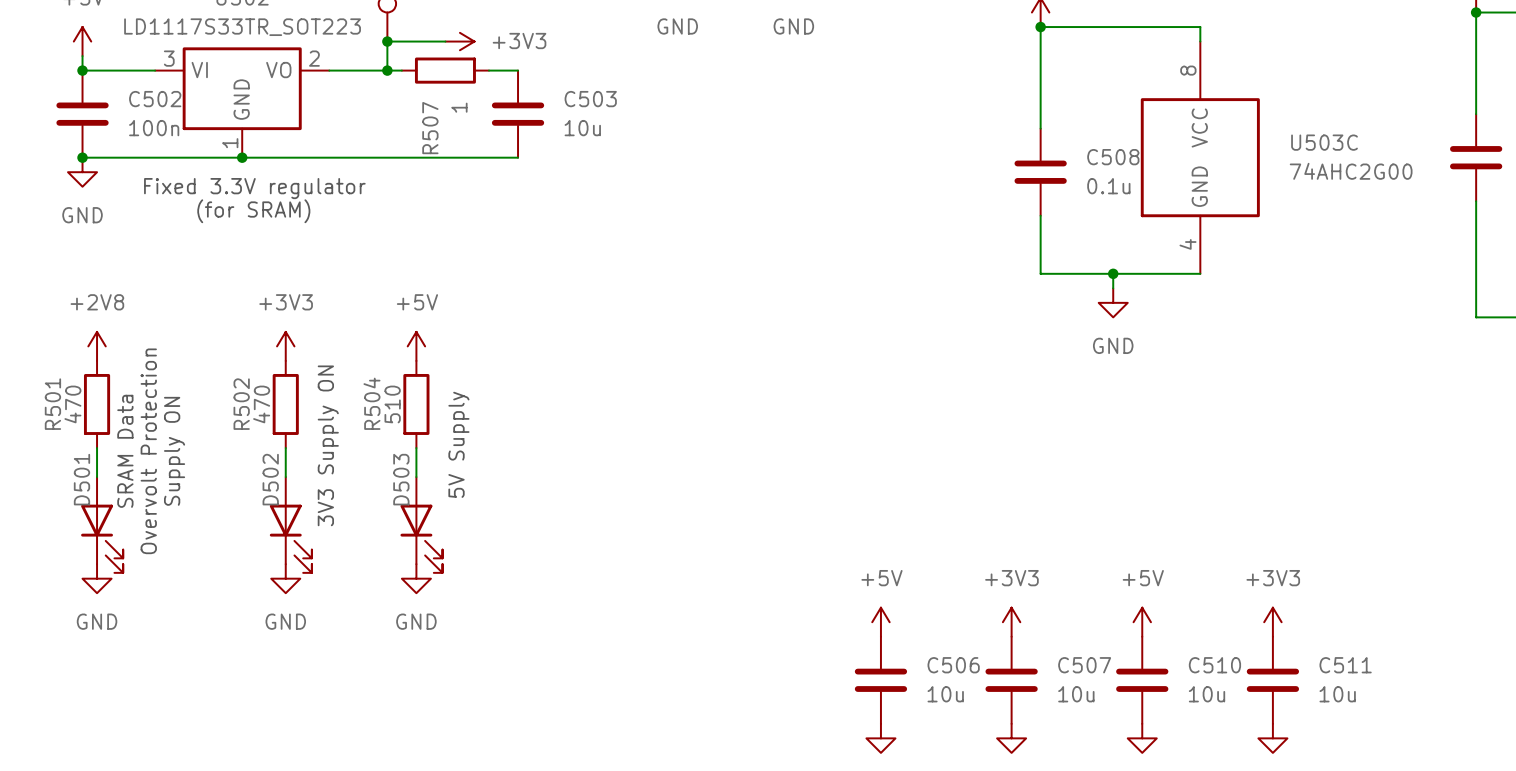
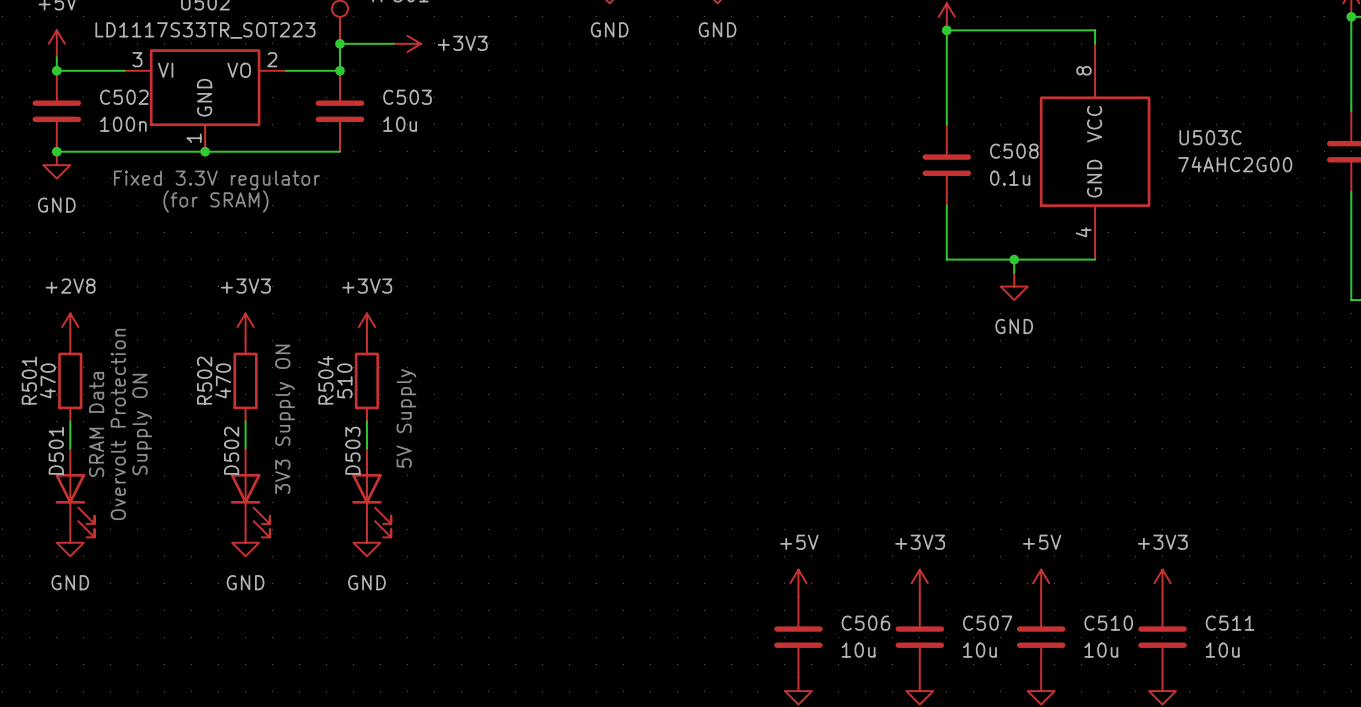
wire: (387, 70) (401, 70) -> none
R507: 1 (445, 70) -> none
wire: (488, 70) (518, 70) -> none
C503 position: (518, 114) -> (339, 111)
wire: (387, 157) (518, 157) -> none
power symbol: +5V (416, 346) -> +3V3 (366, 327)

